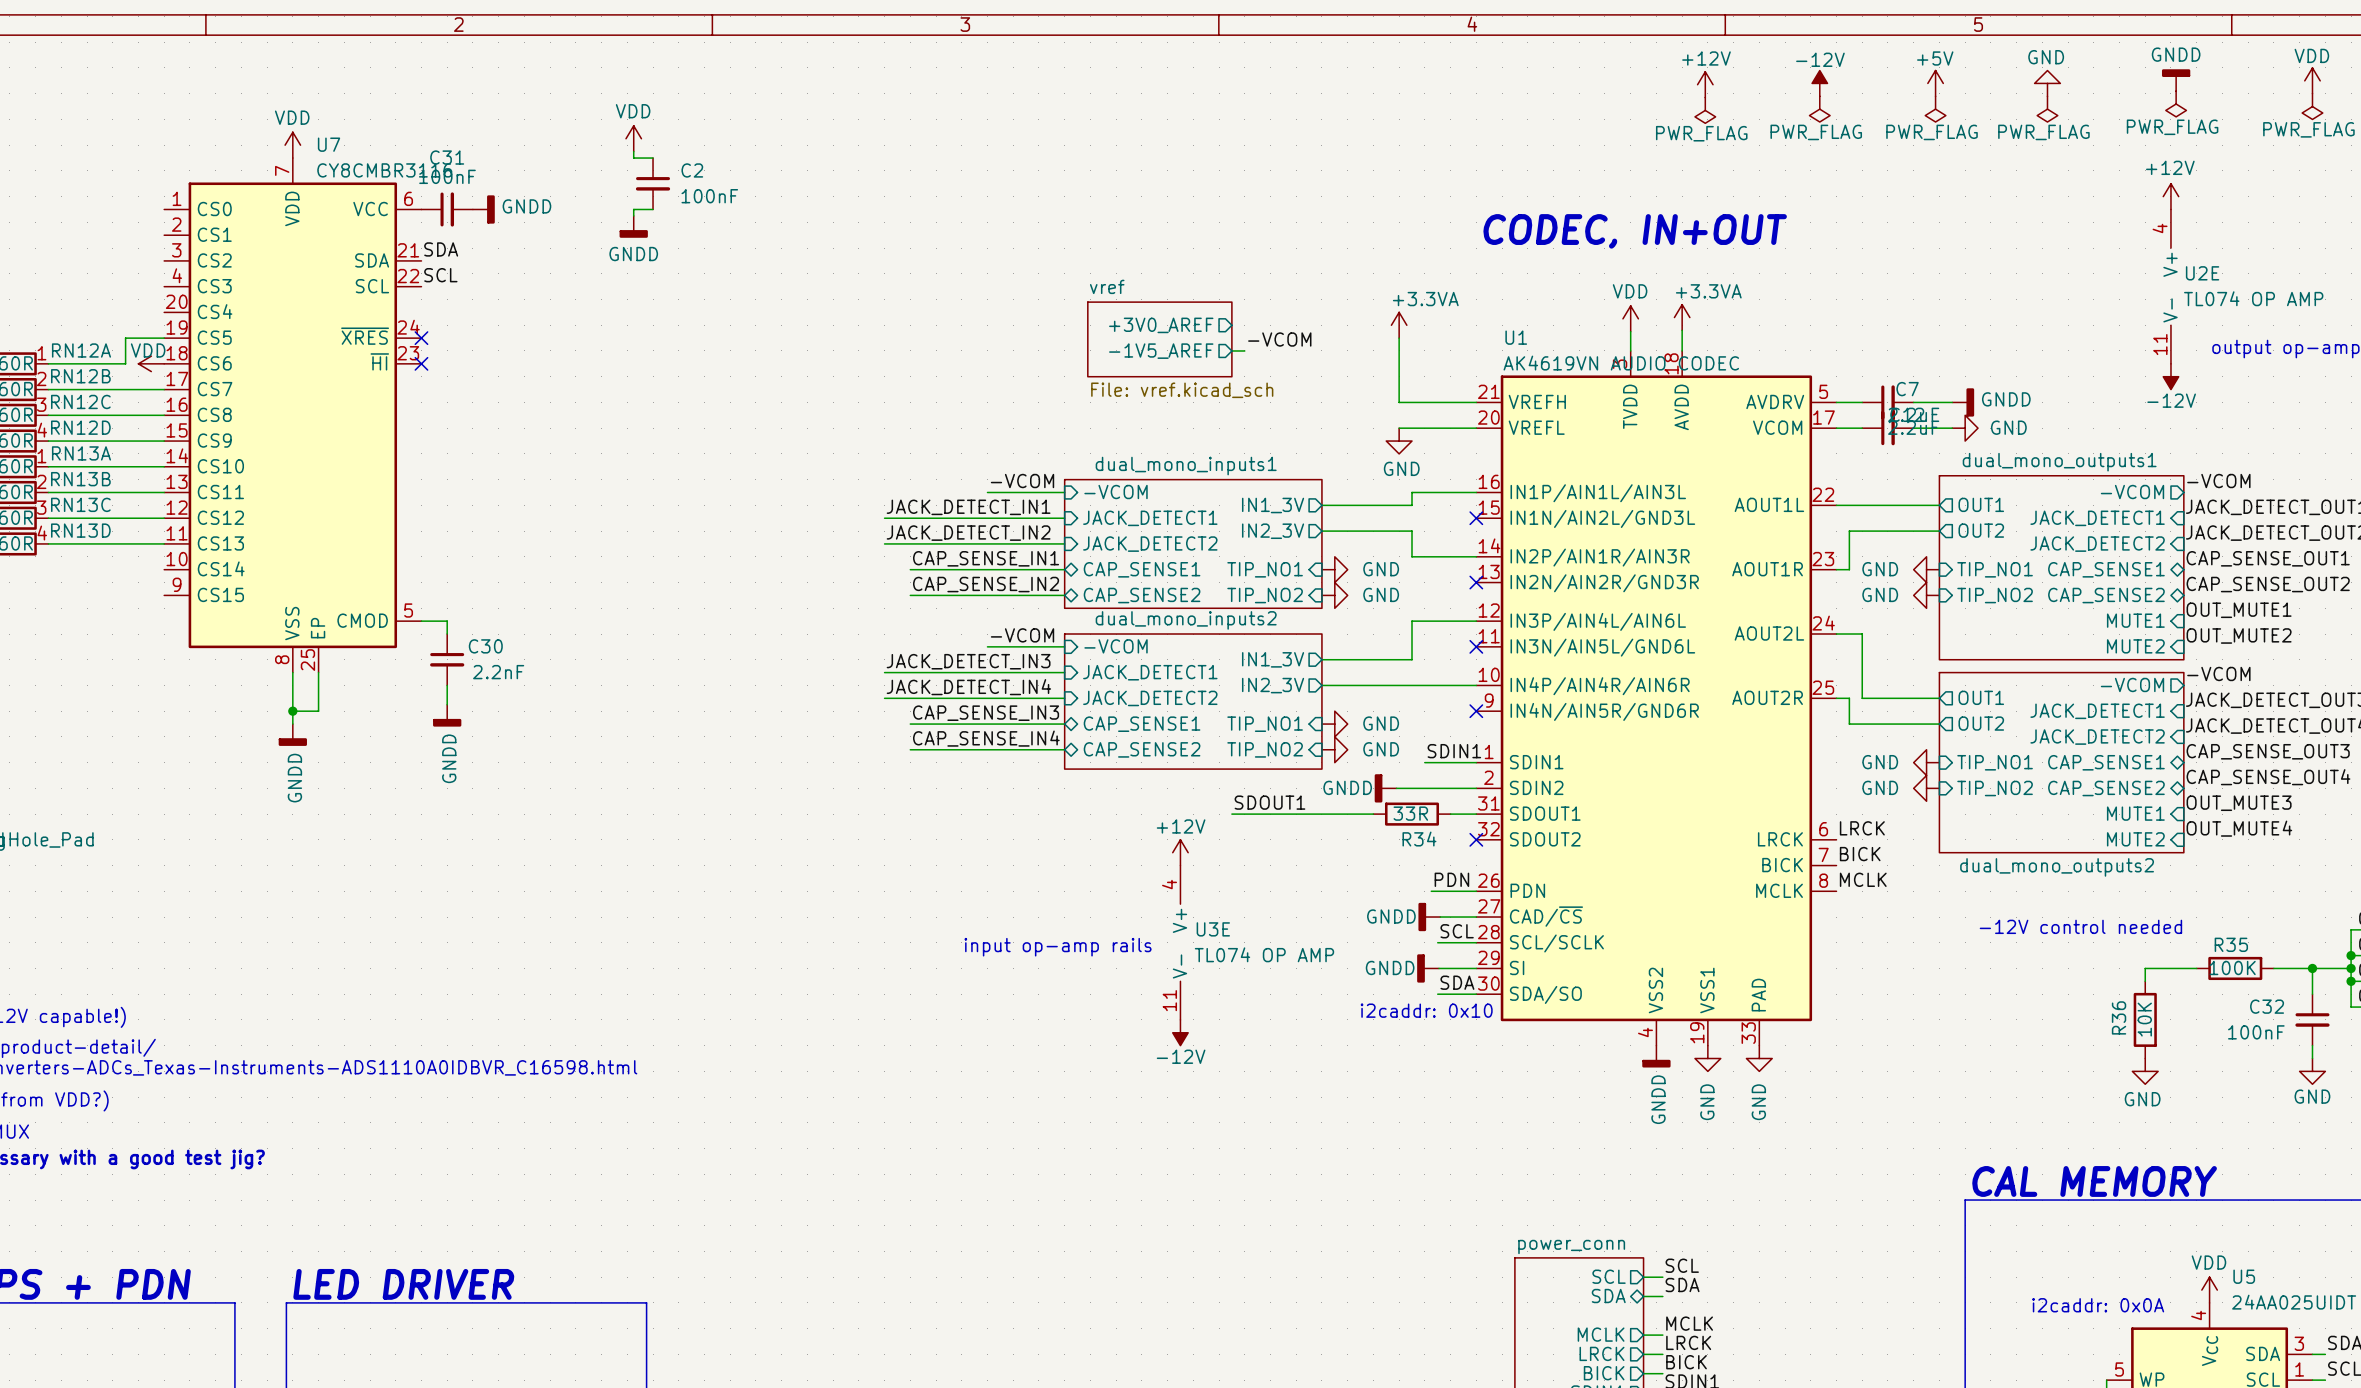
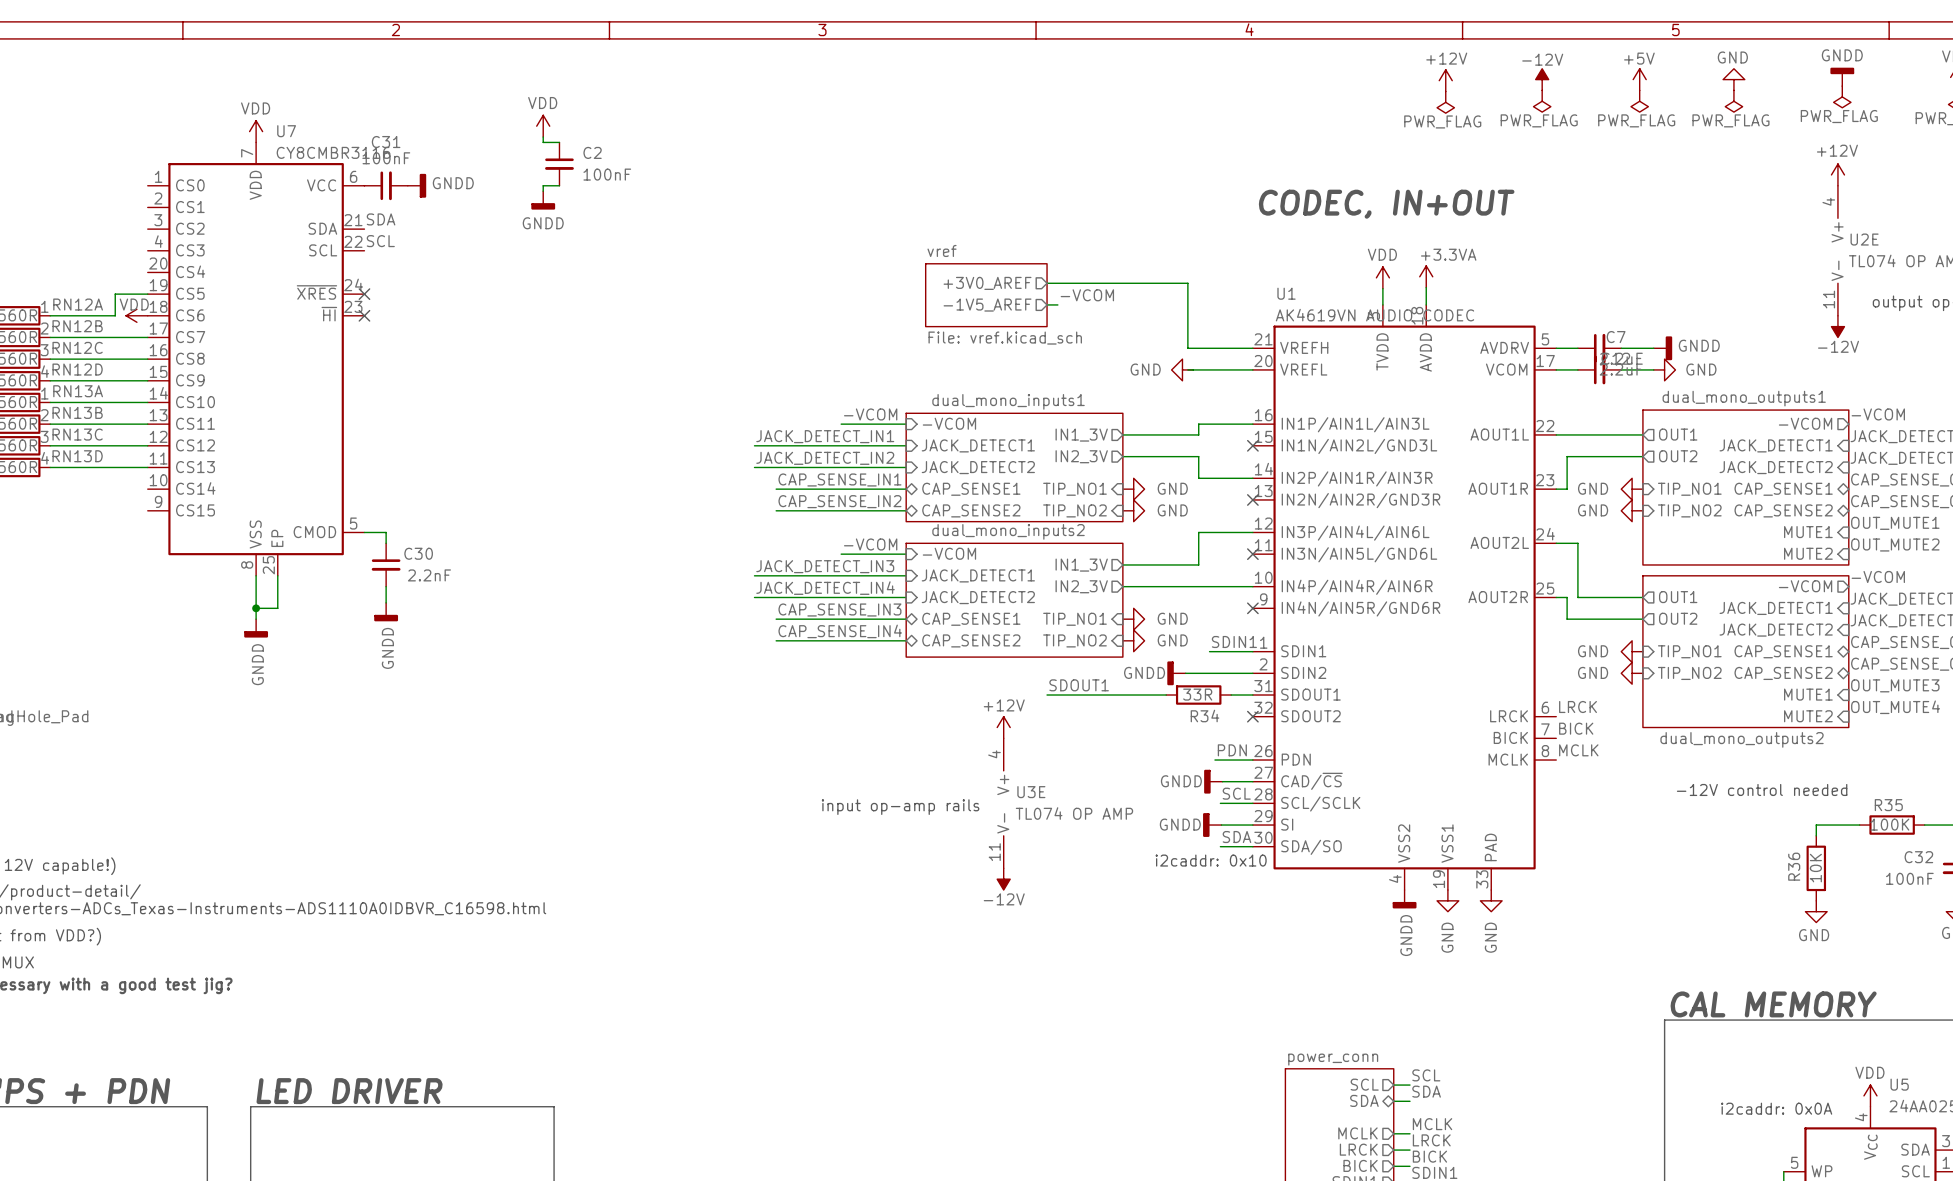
wire: none -> (1047, 283) (1187, 283) (1187, 294)
power symbol: +3.3VA (1399, 325) -> none
power symbol rotation: 0° (1399, 441) -> 90° clockwise (1182, 369)

